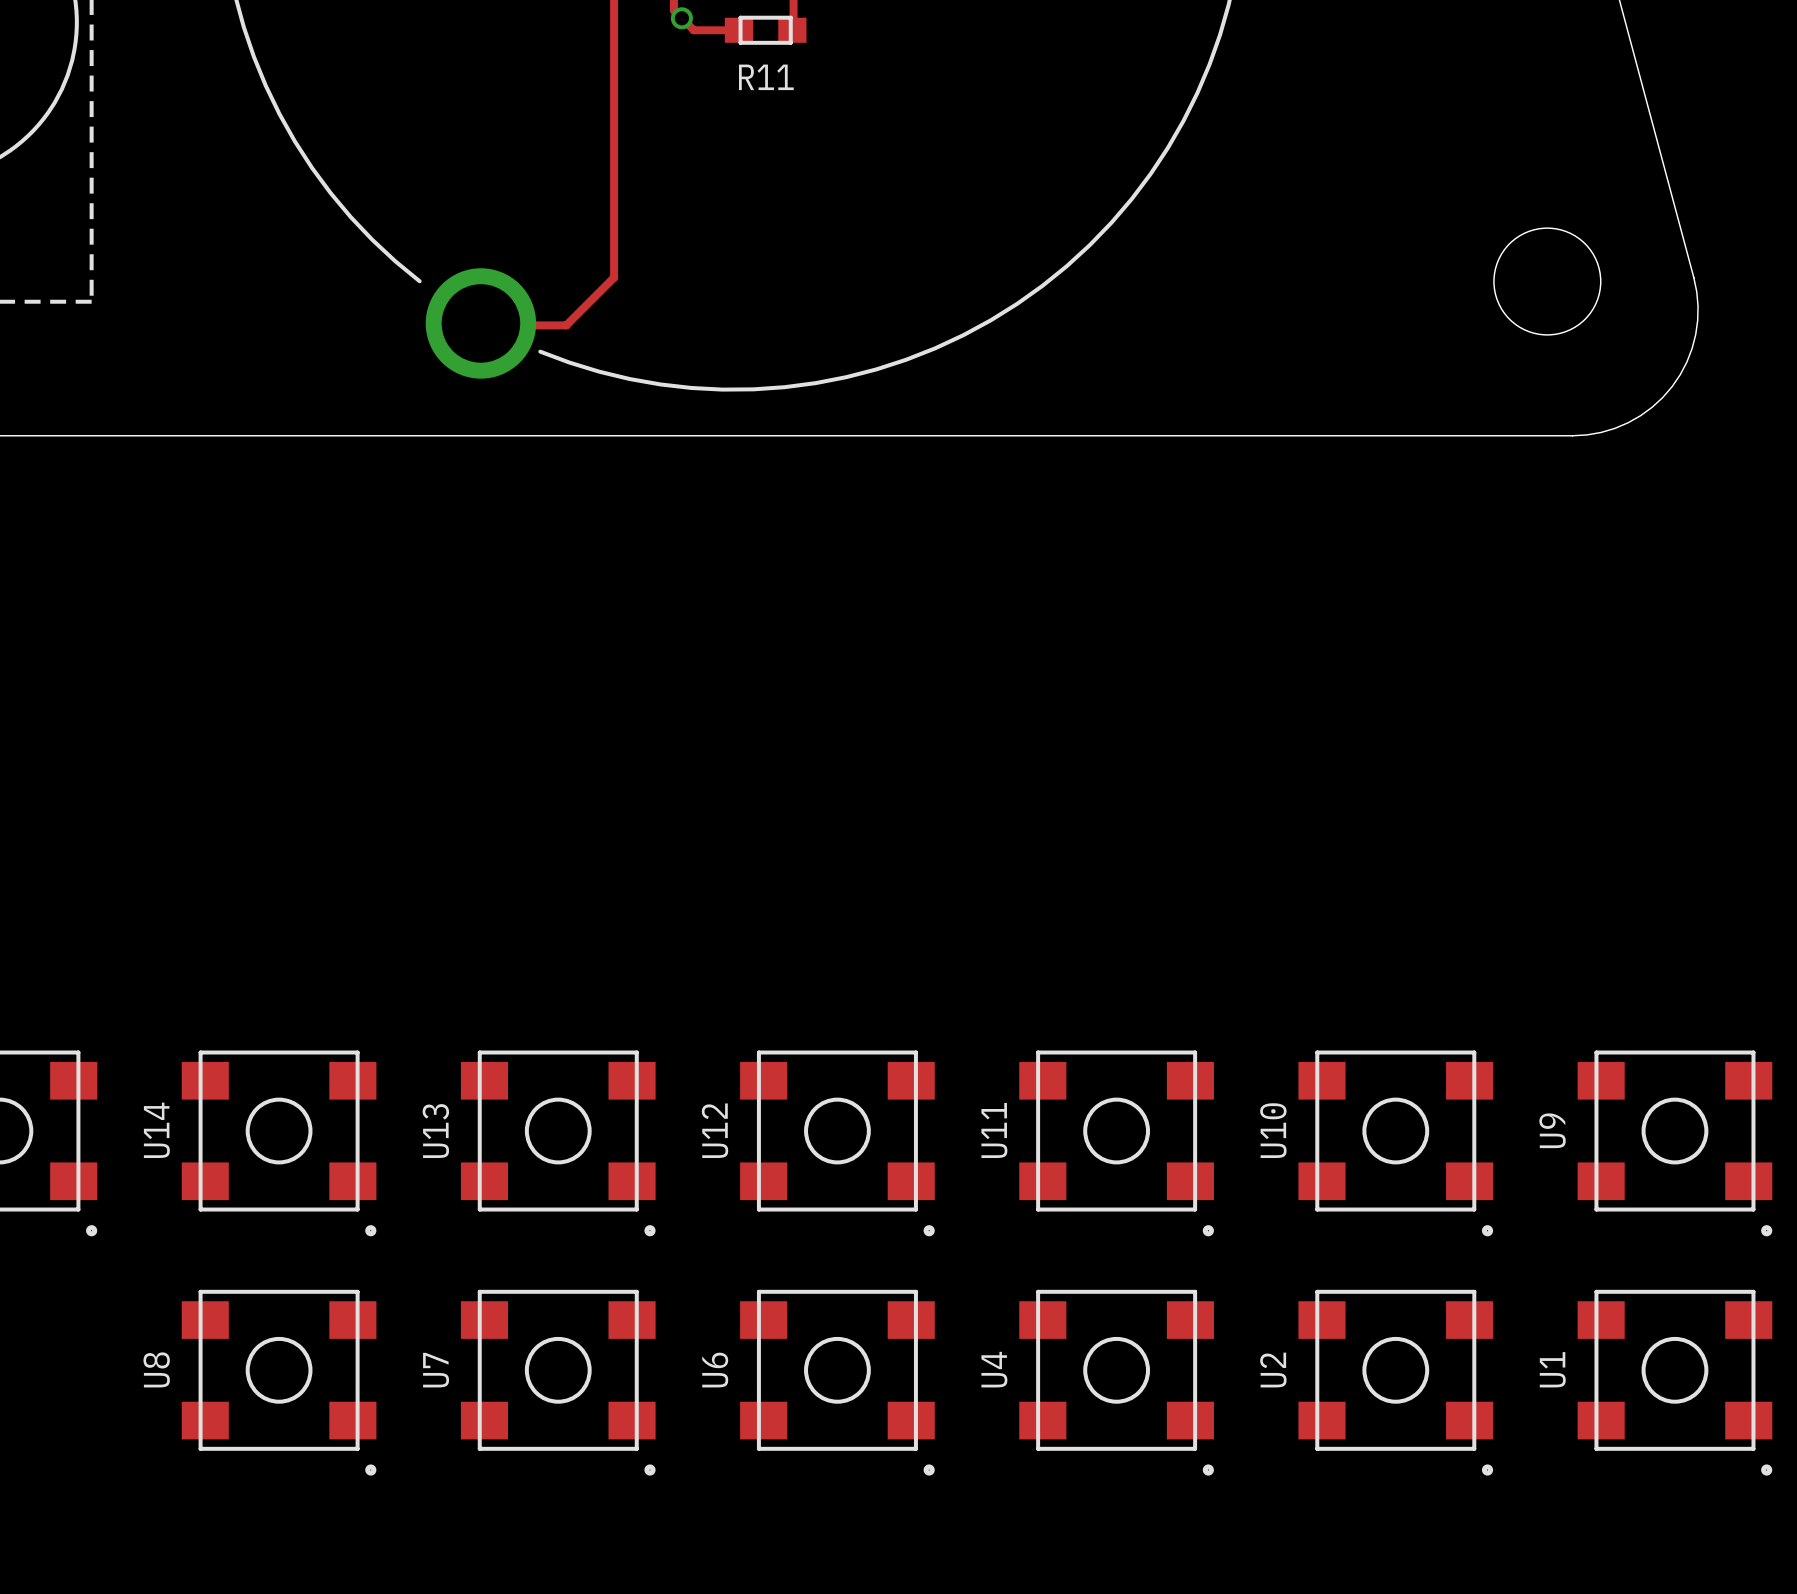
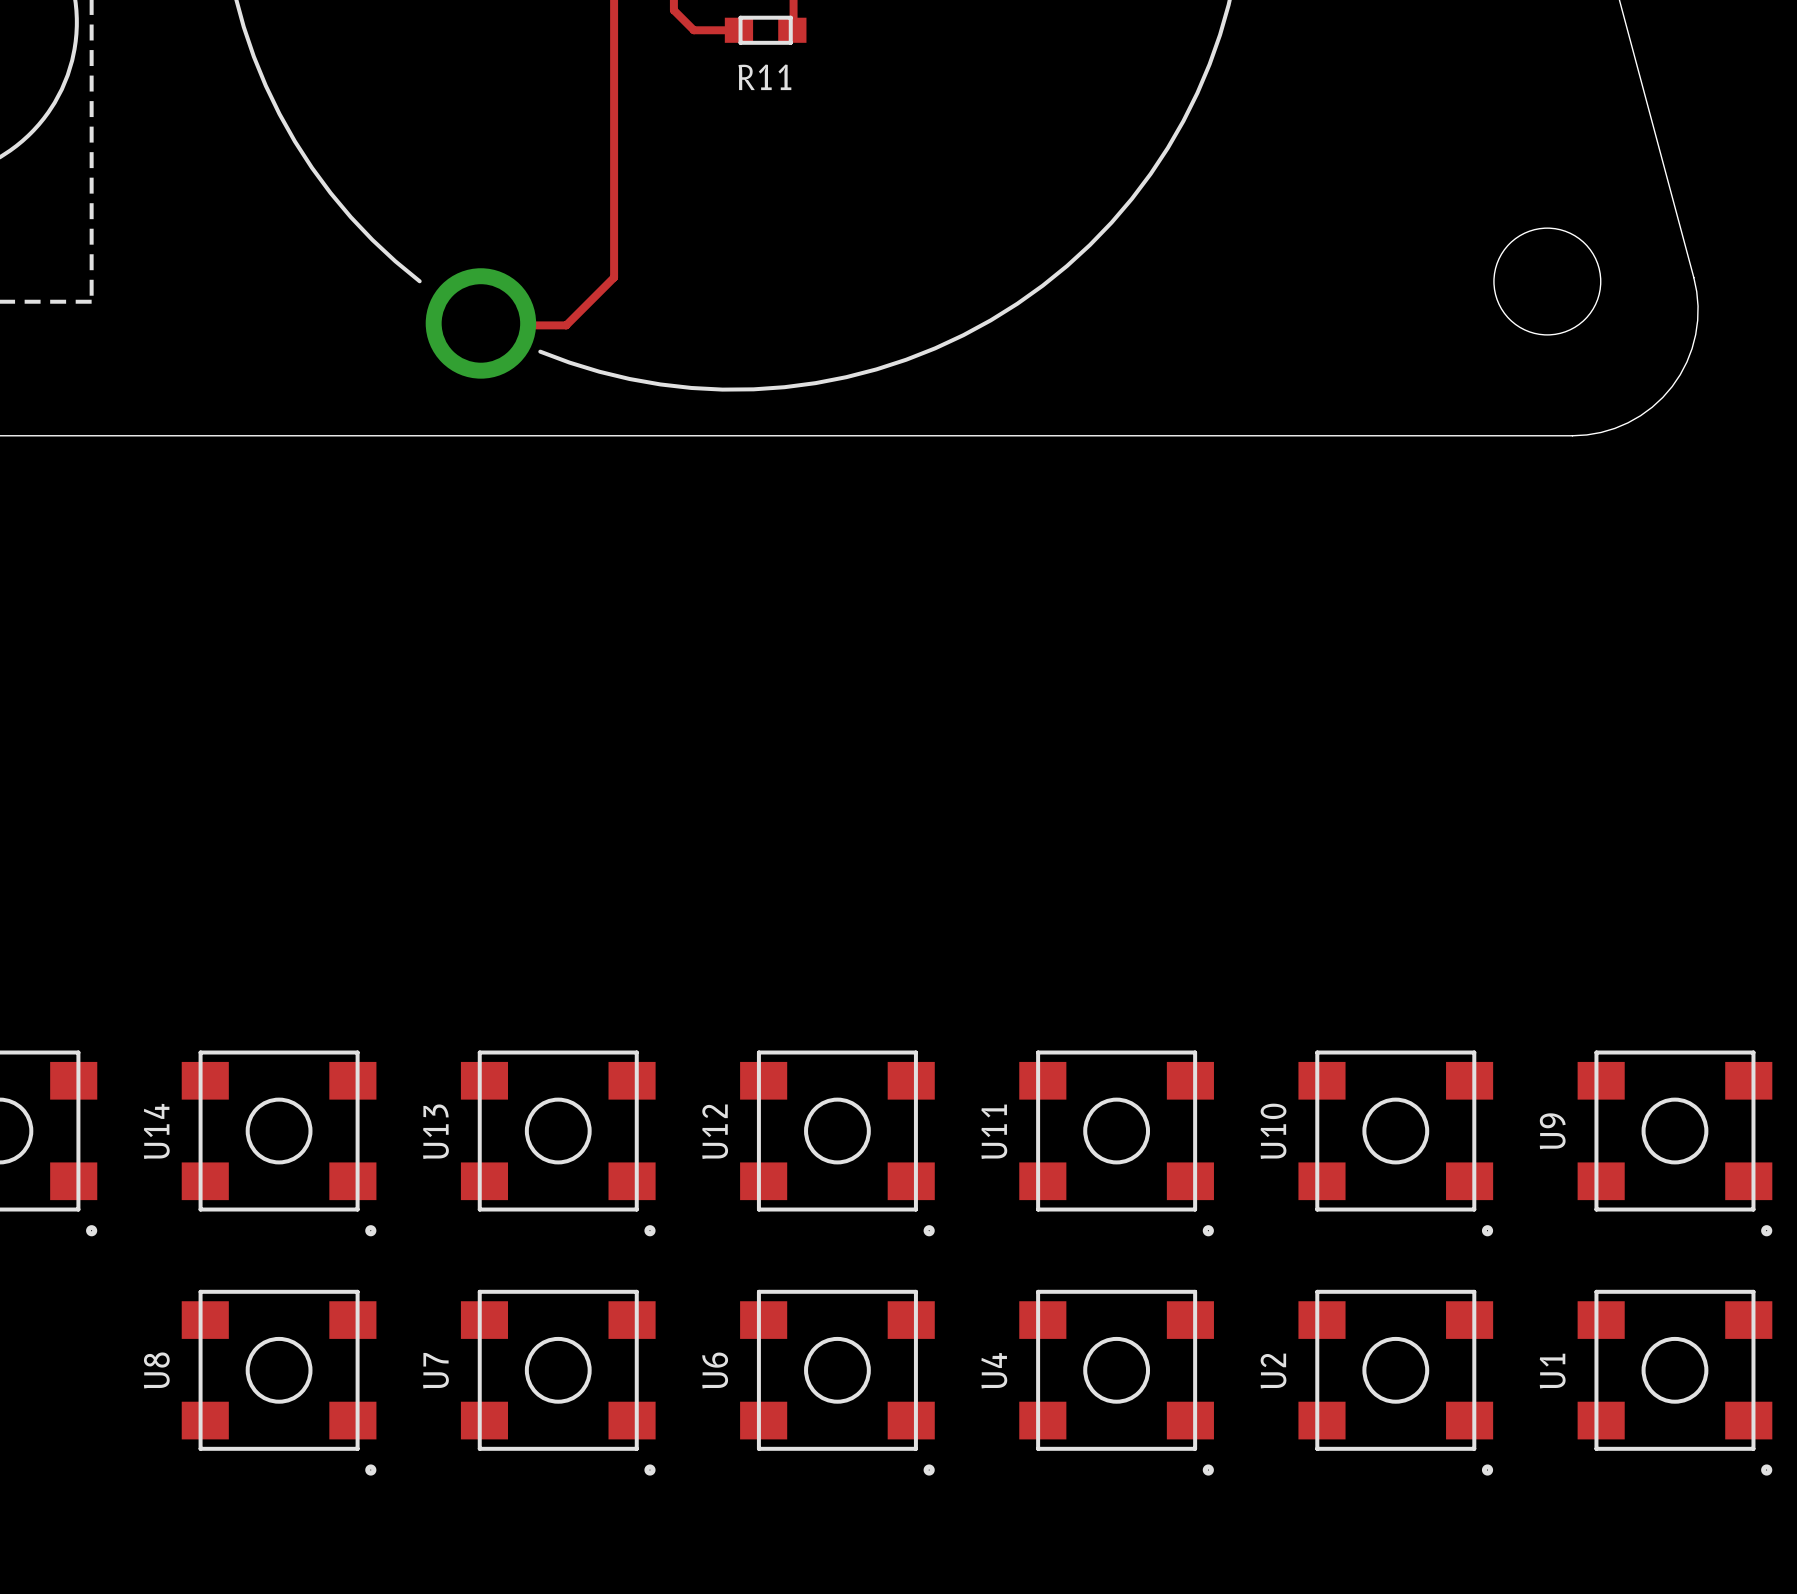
via: (681, 18) -> none

